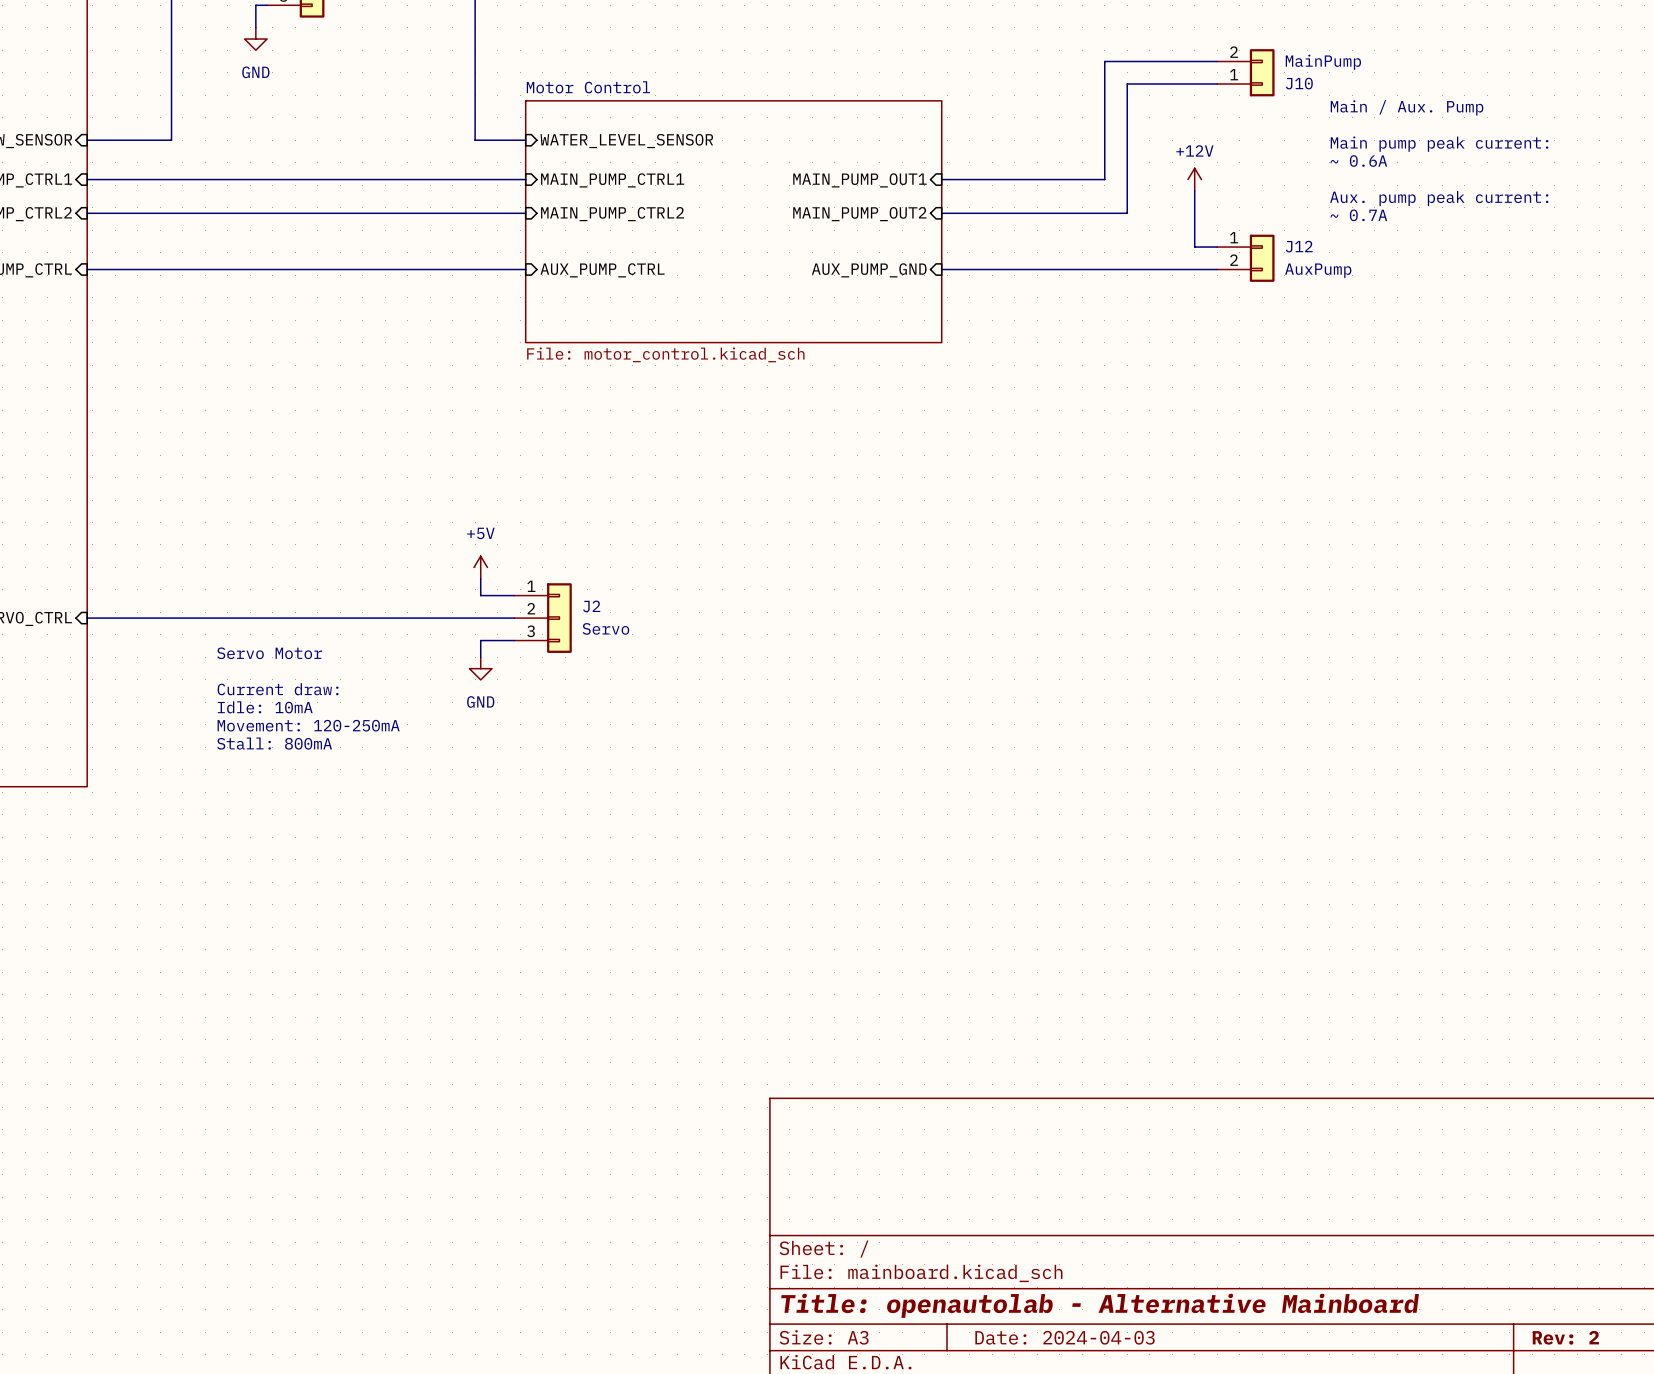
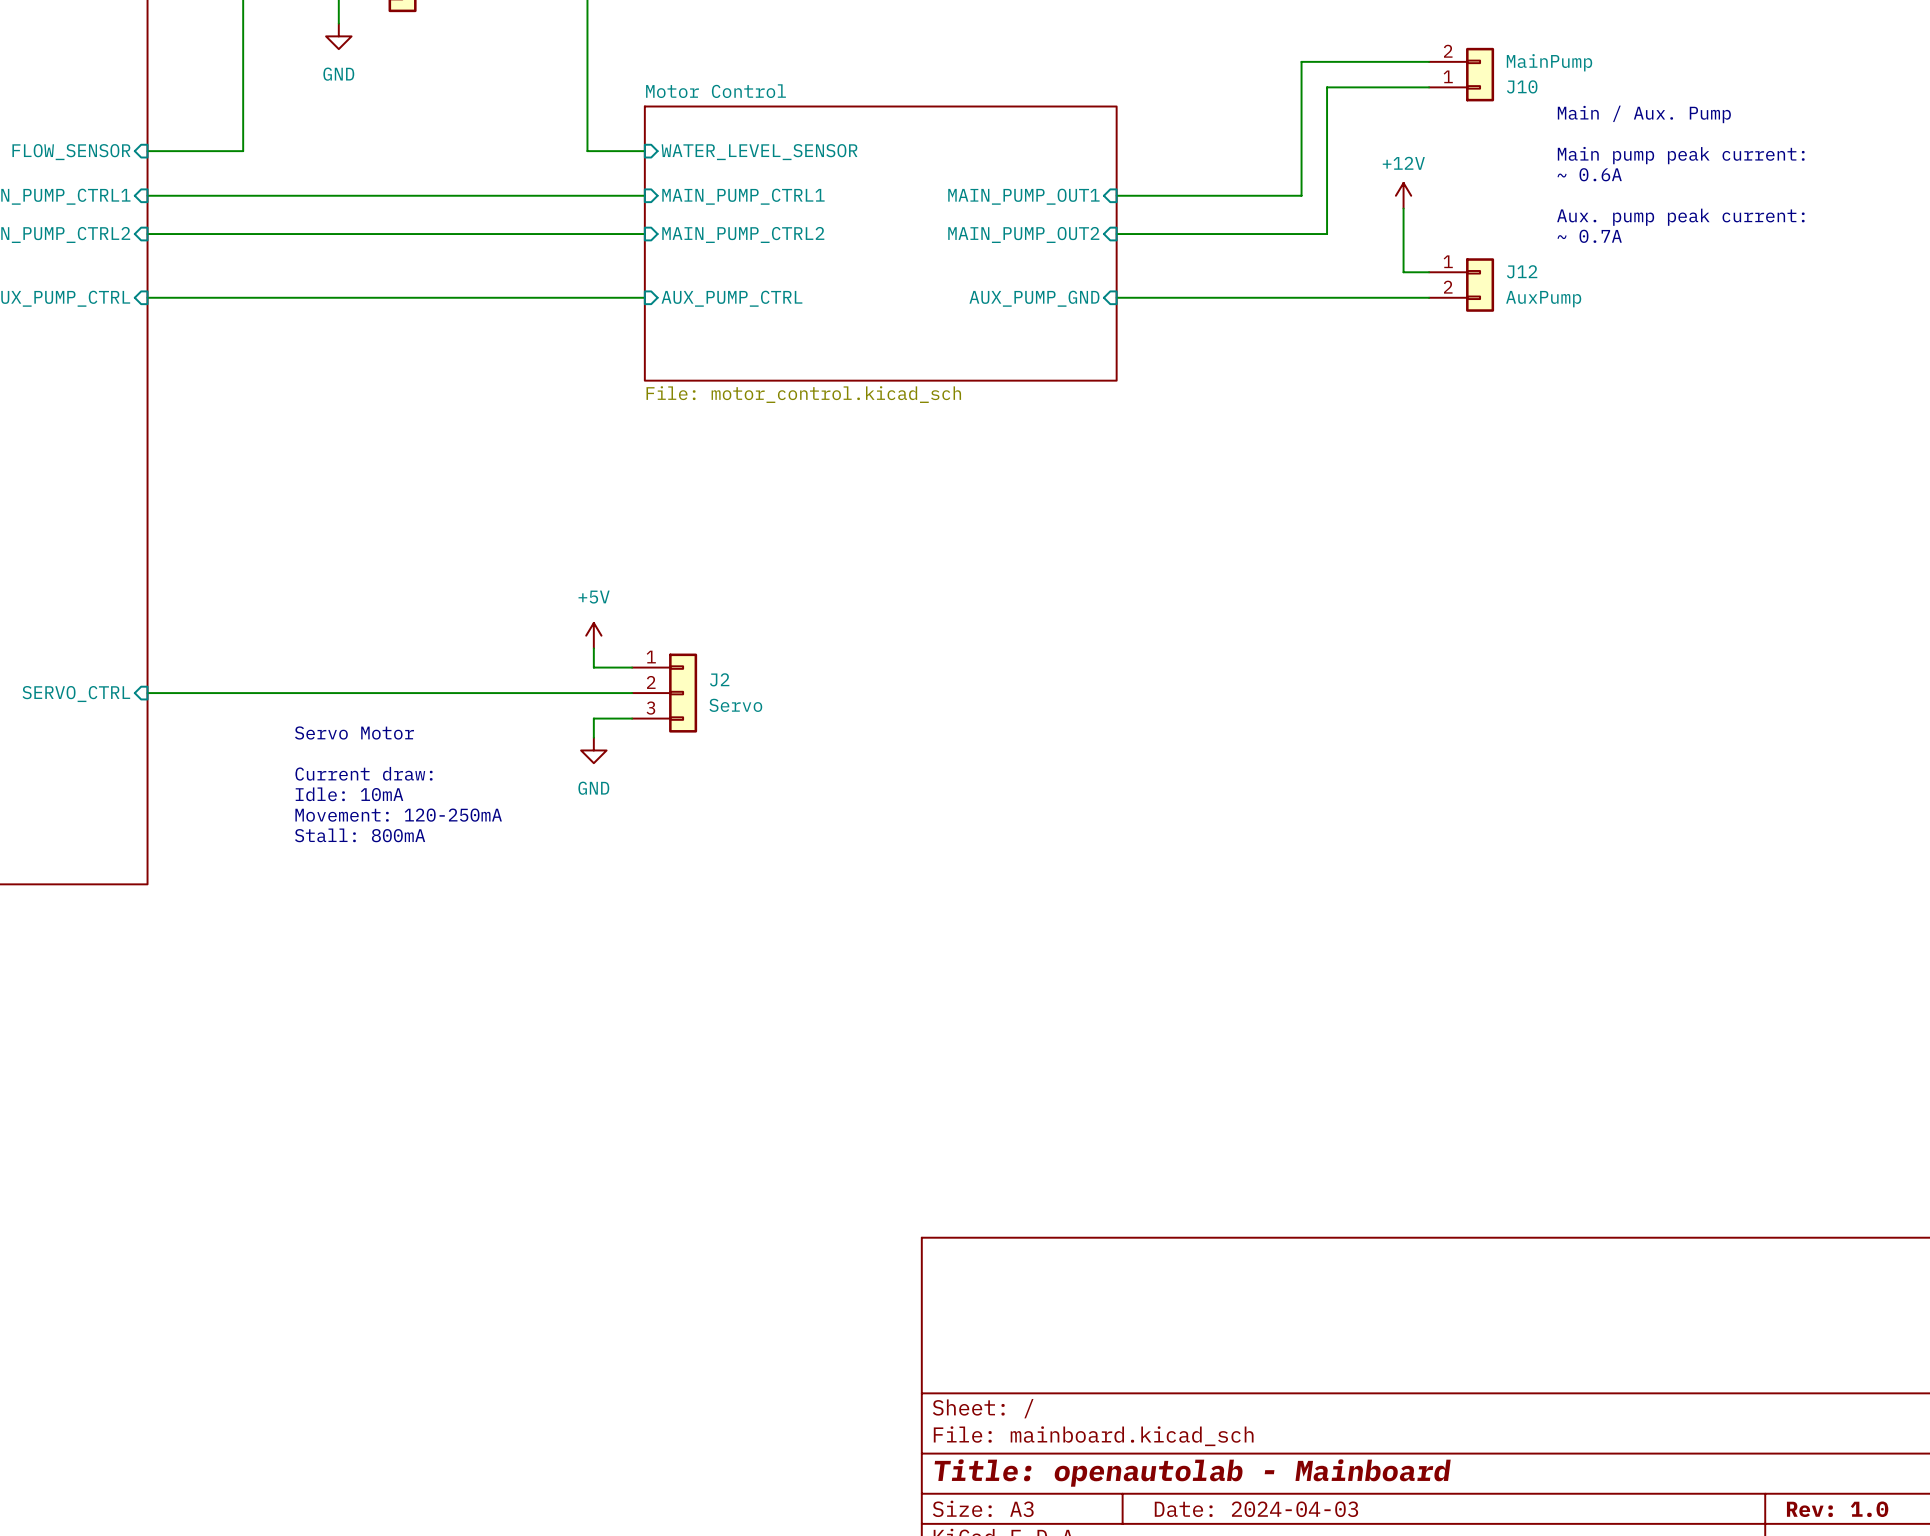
title block: Title: openautolab - Alternative Mainboard (1100, 1305) -> Title: openautolab - Mainboard (1192, 1473)
title block: Rev: 2 (1565, 1337) -> Rev: 1.0 (1837, 1509)

